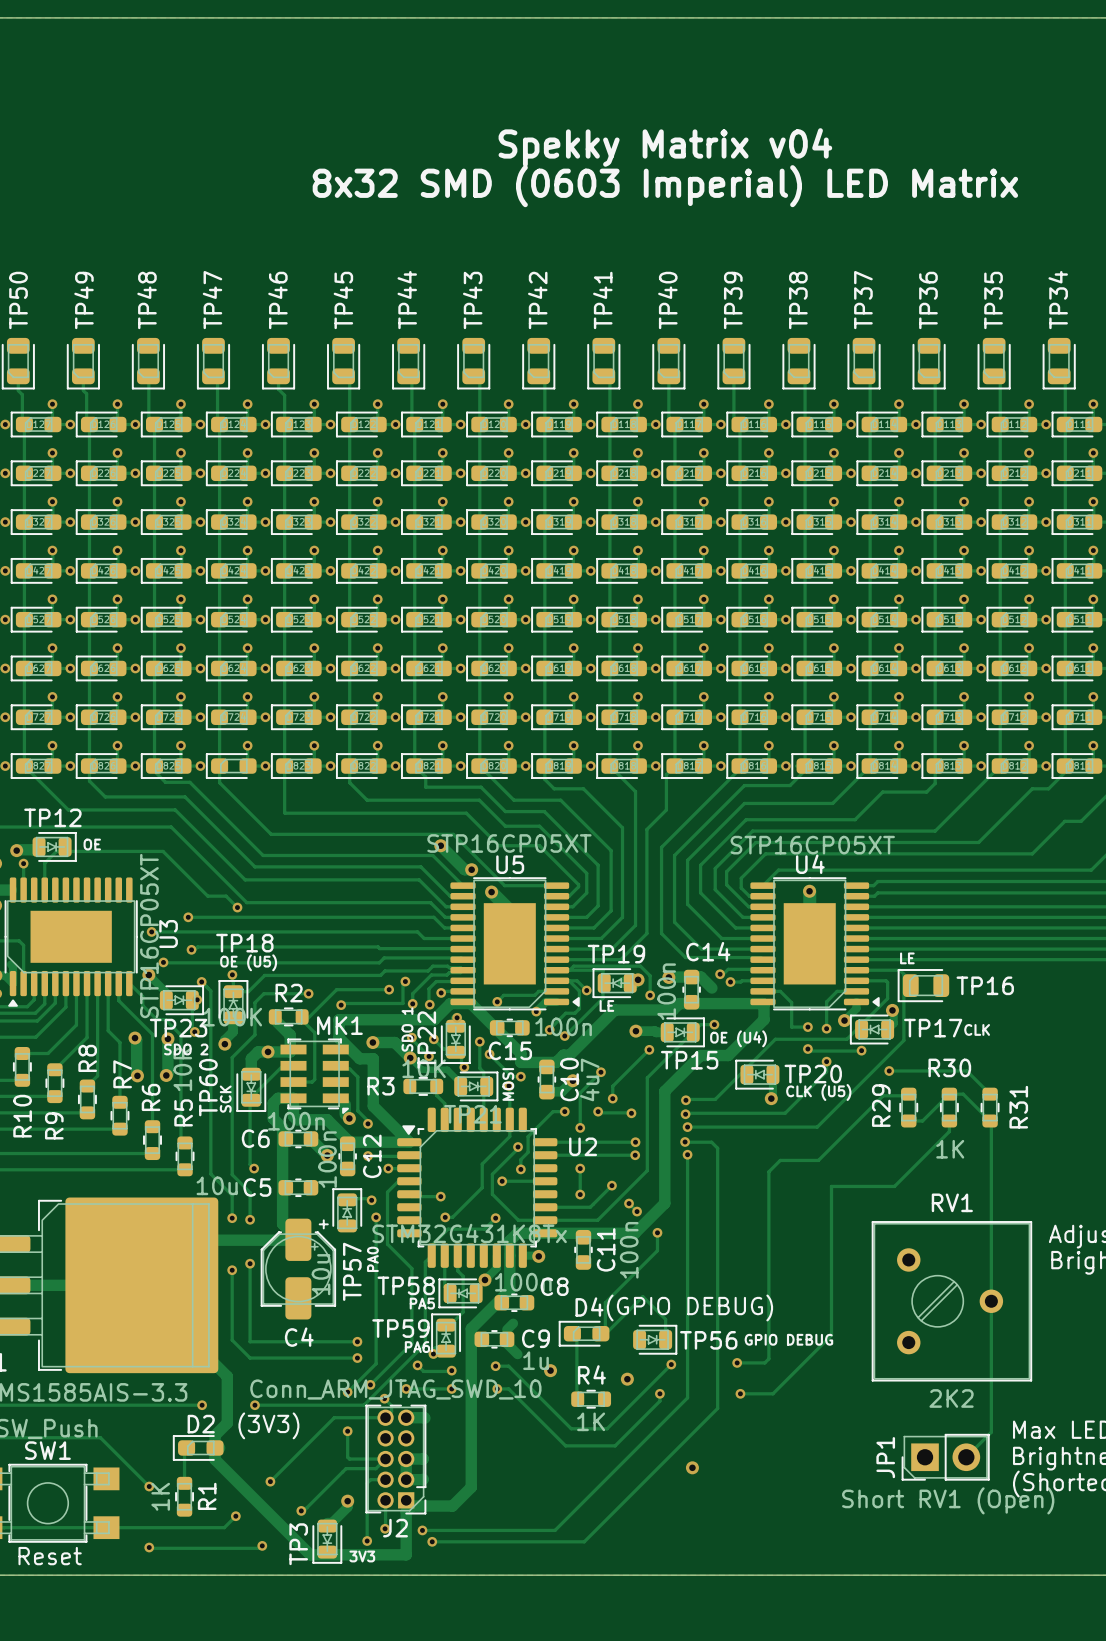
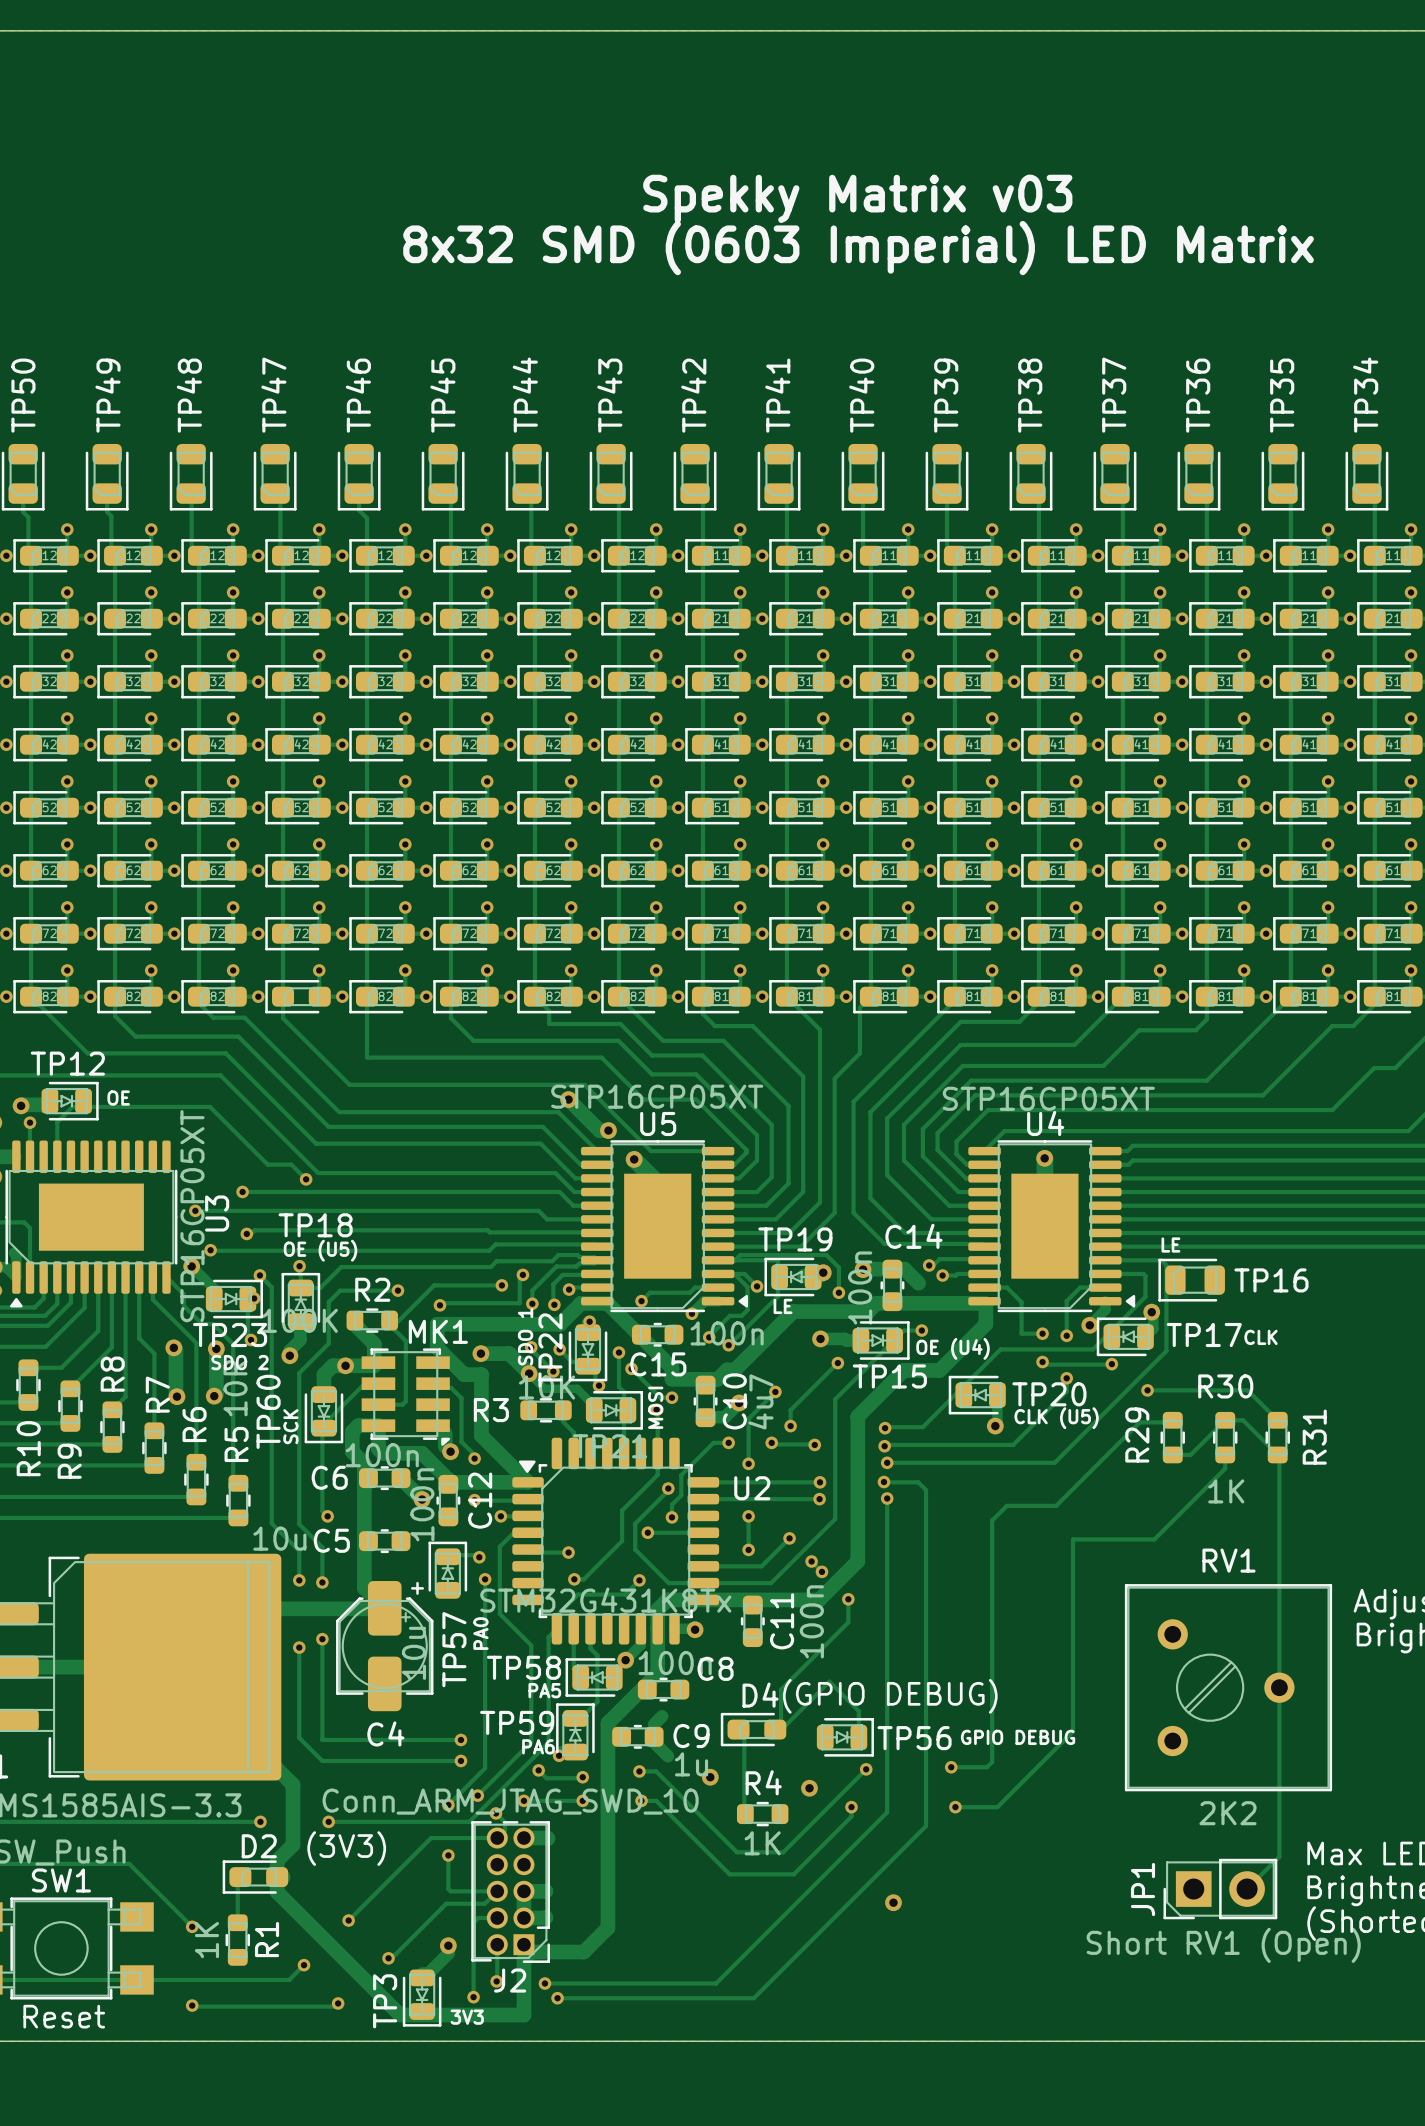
text: Spekky Matrix v04 (665, 147) -> Spekky Matrix v03 (857, 198)

